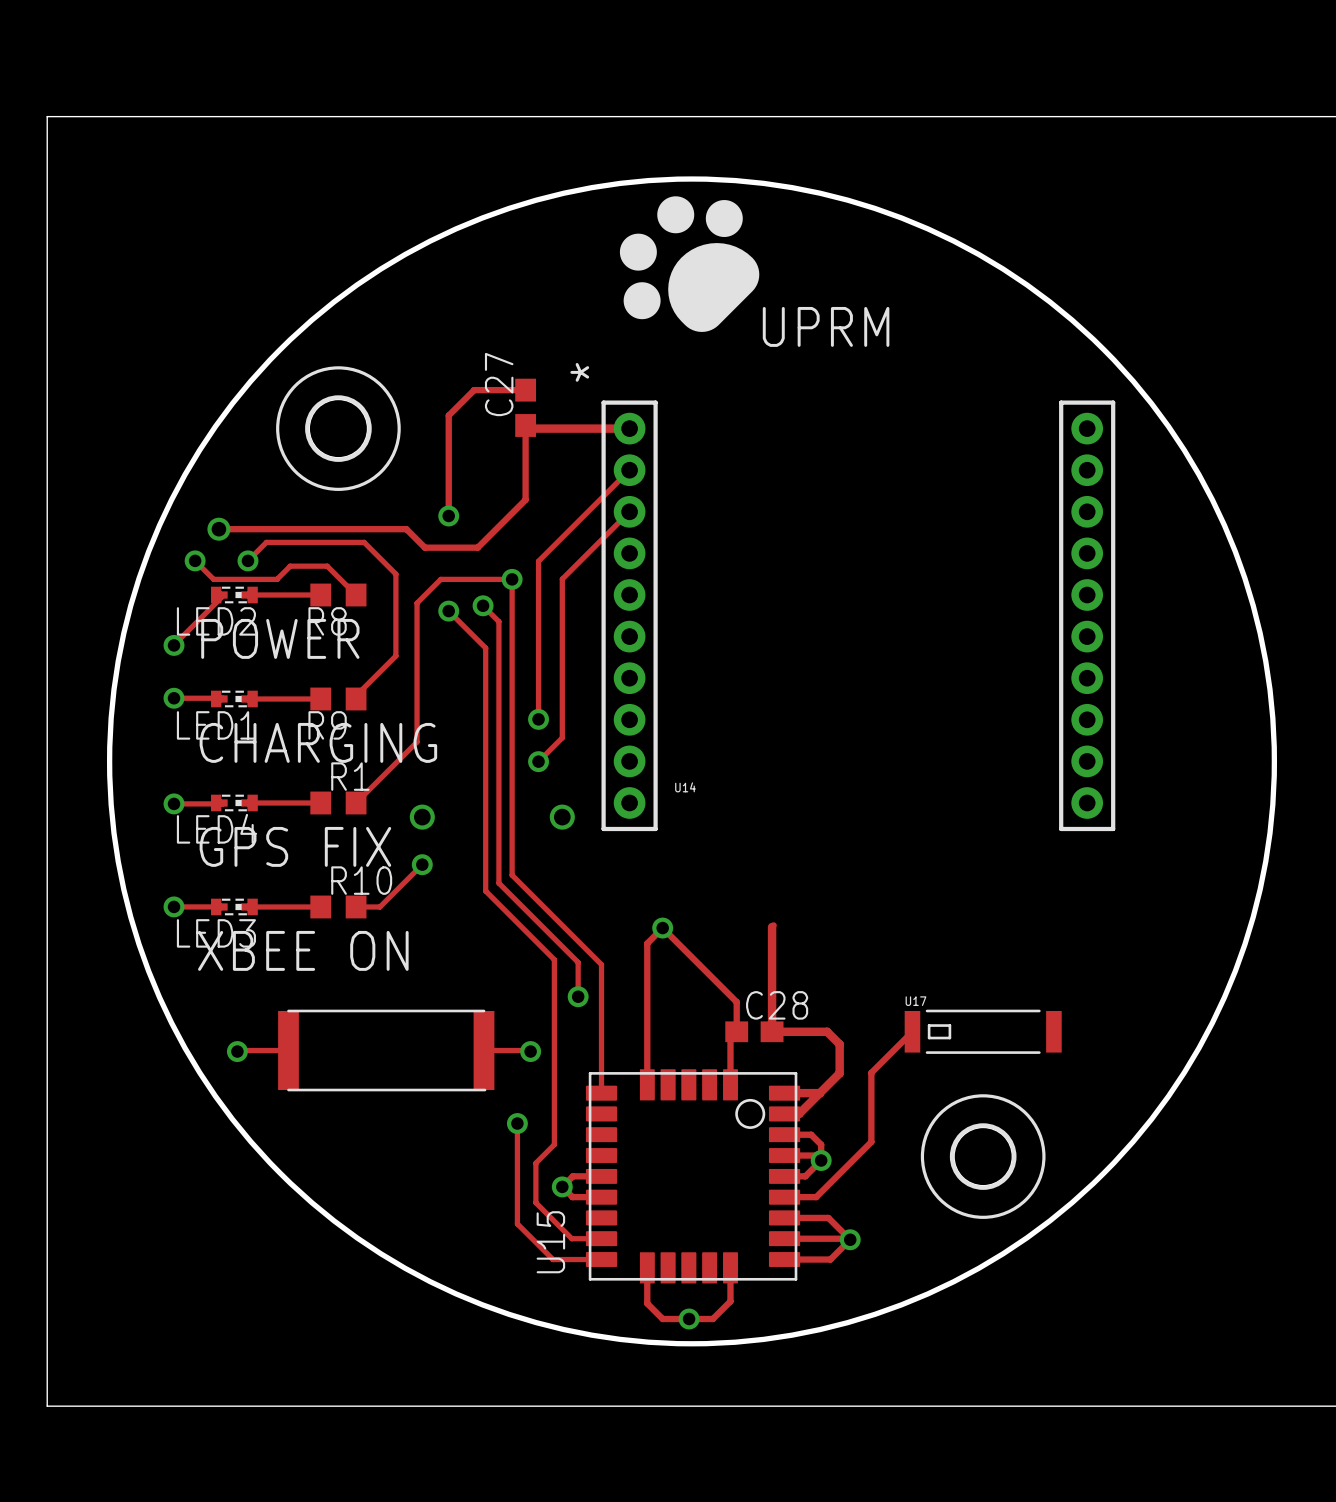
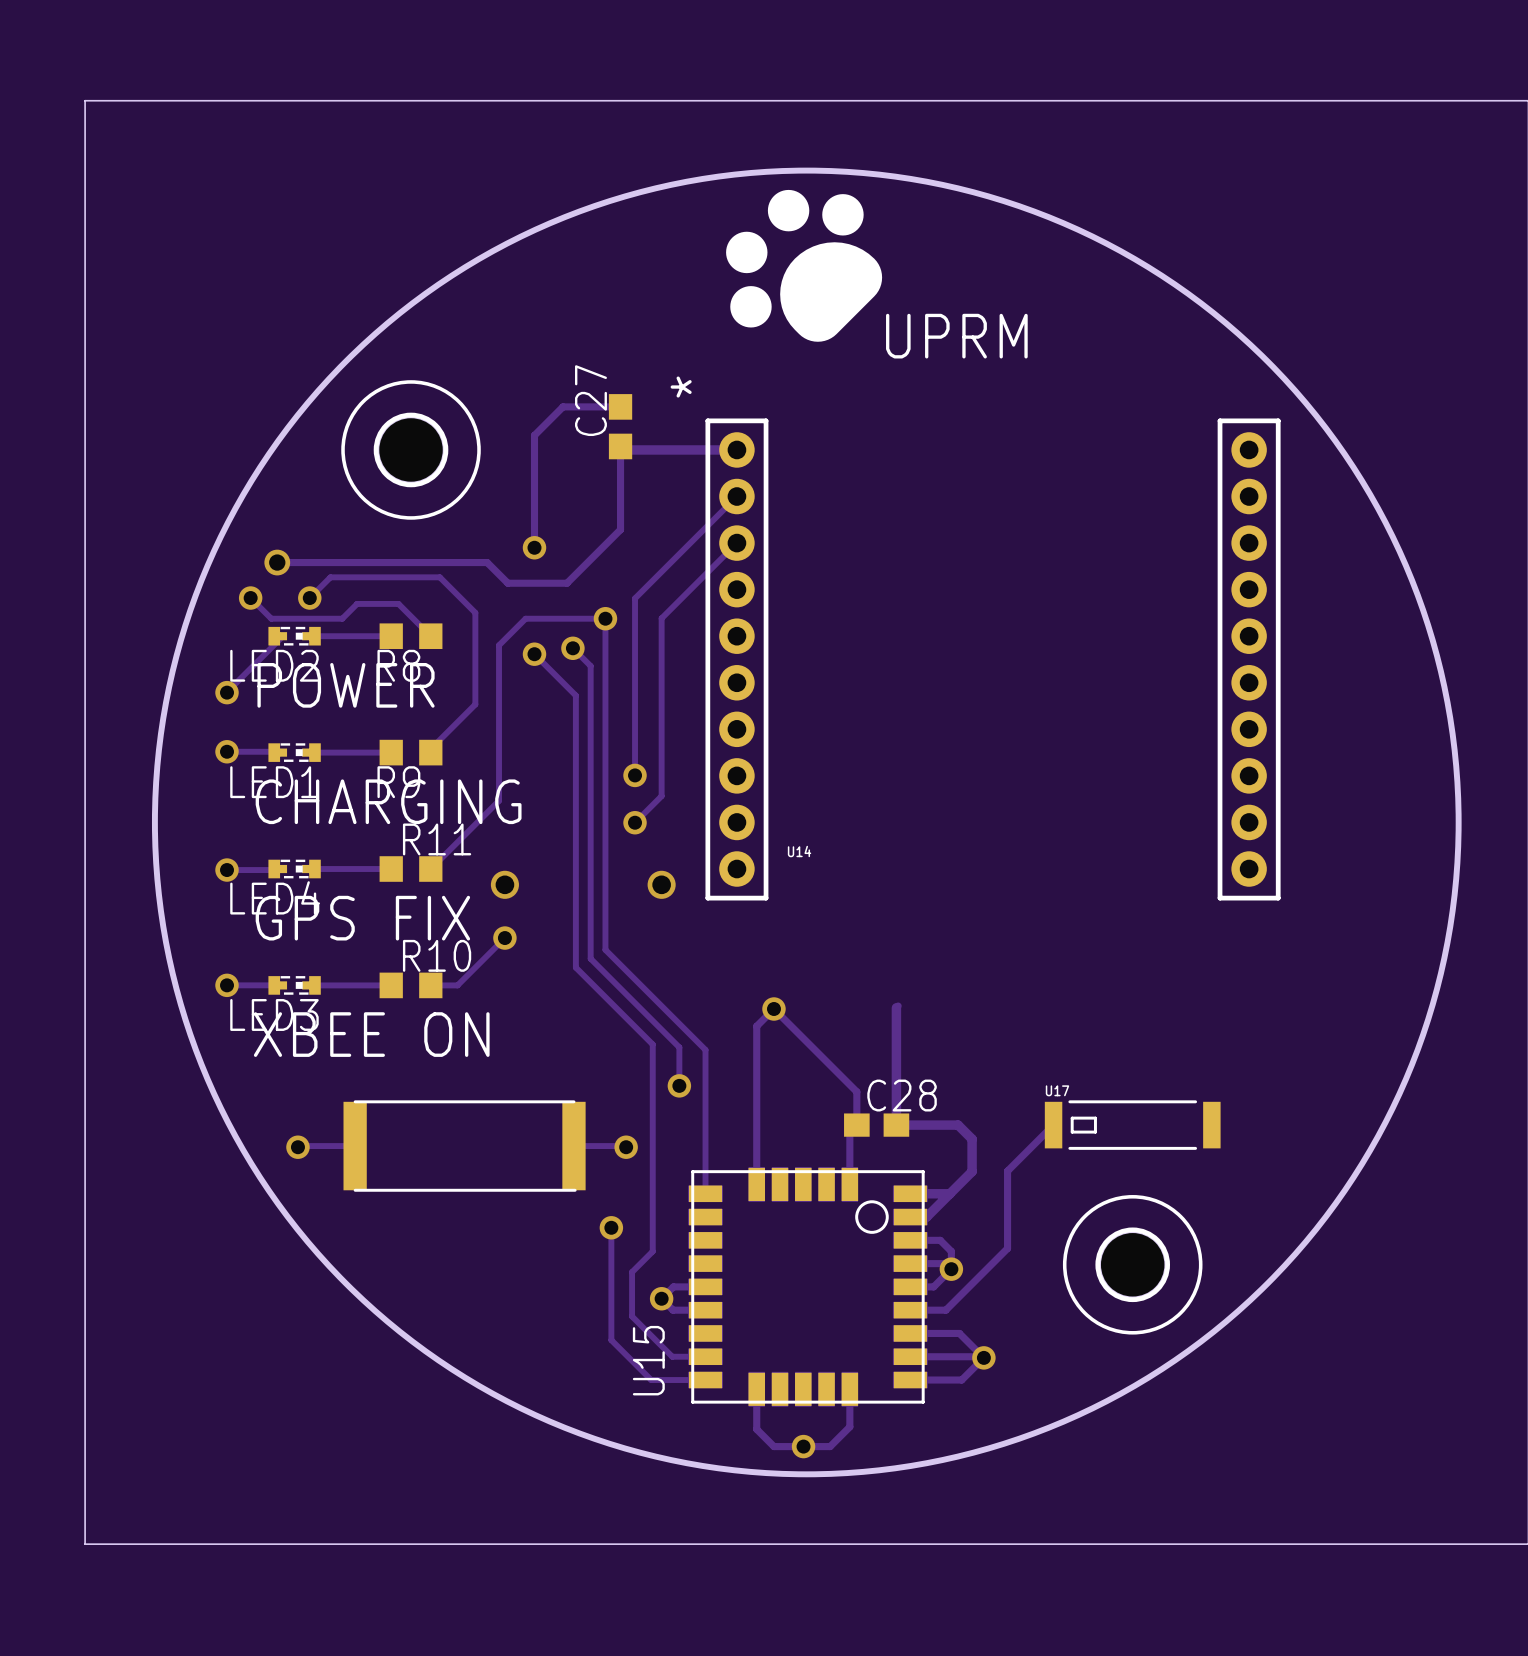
R1 name: R1 (350, 776) -> R11 (437, 839)

